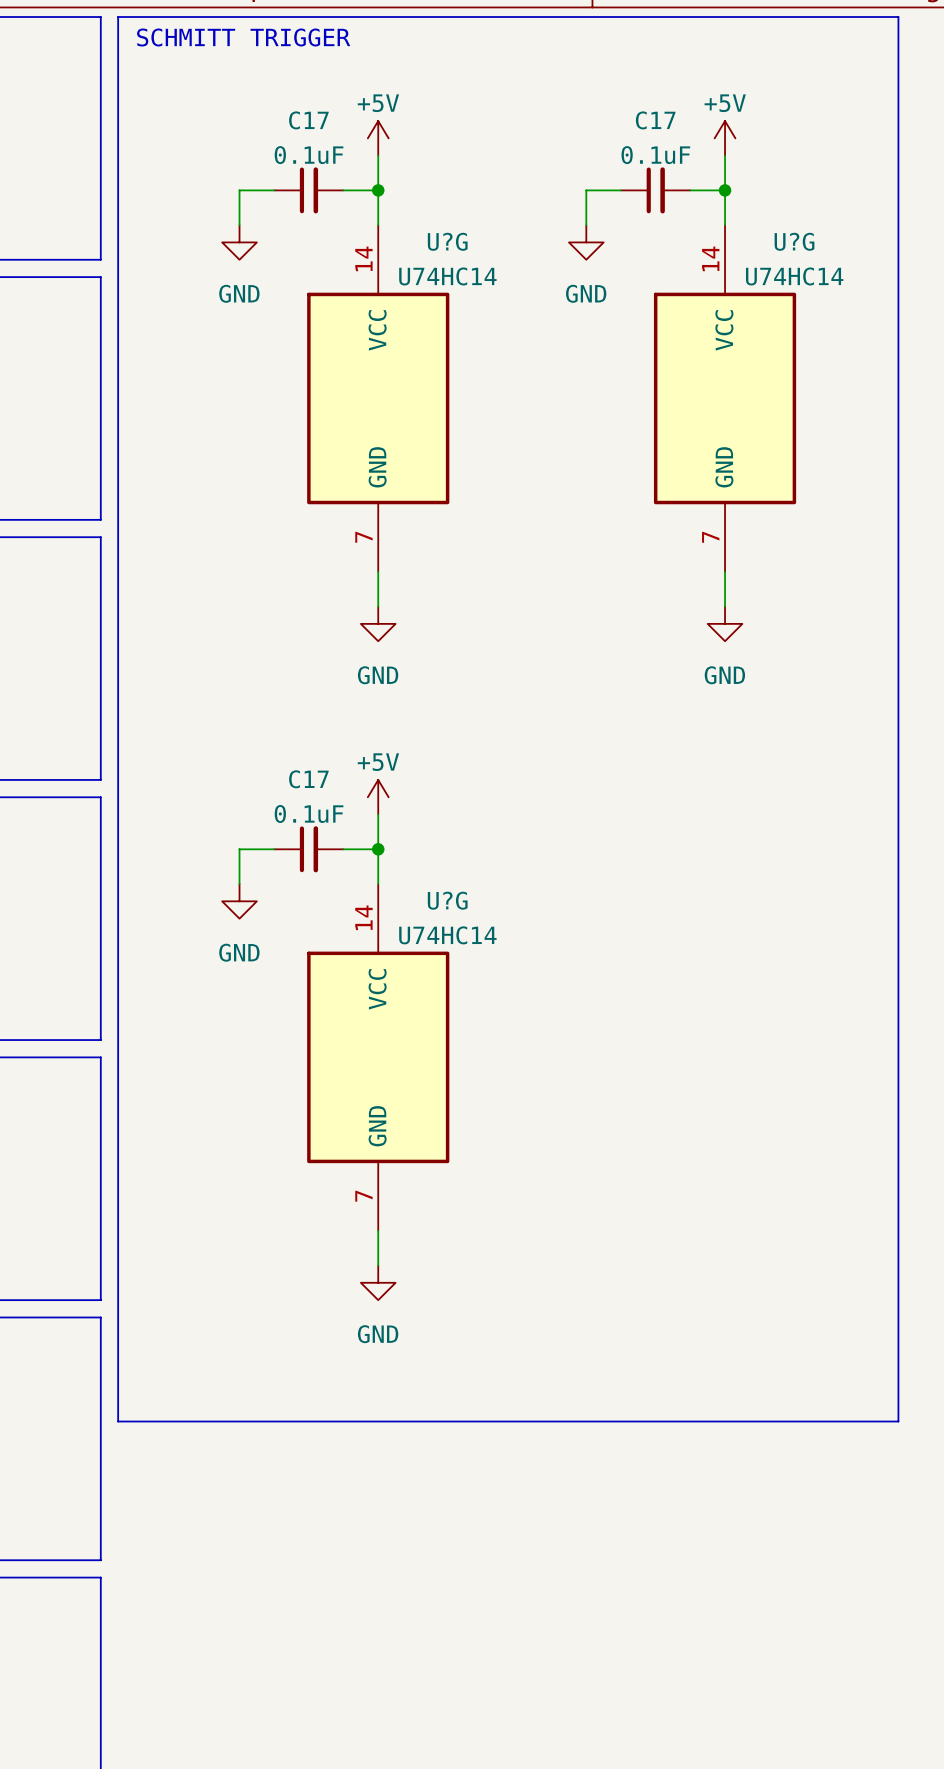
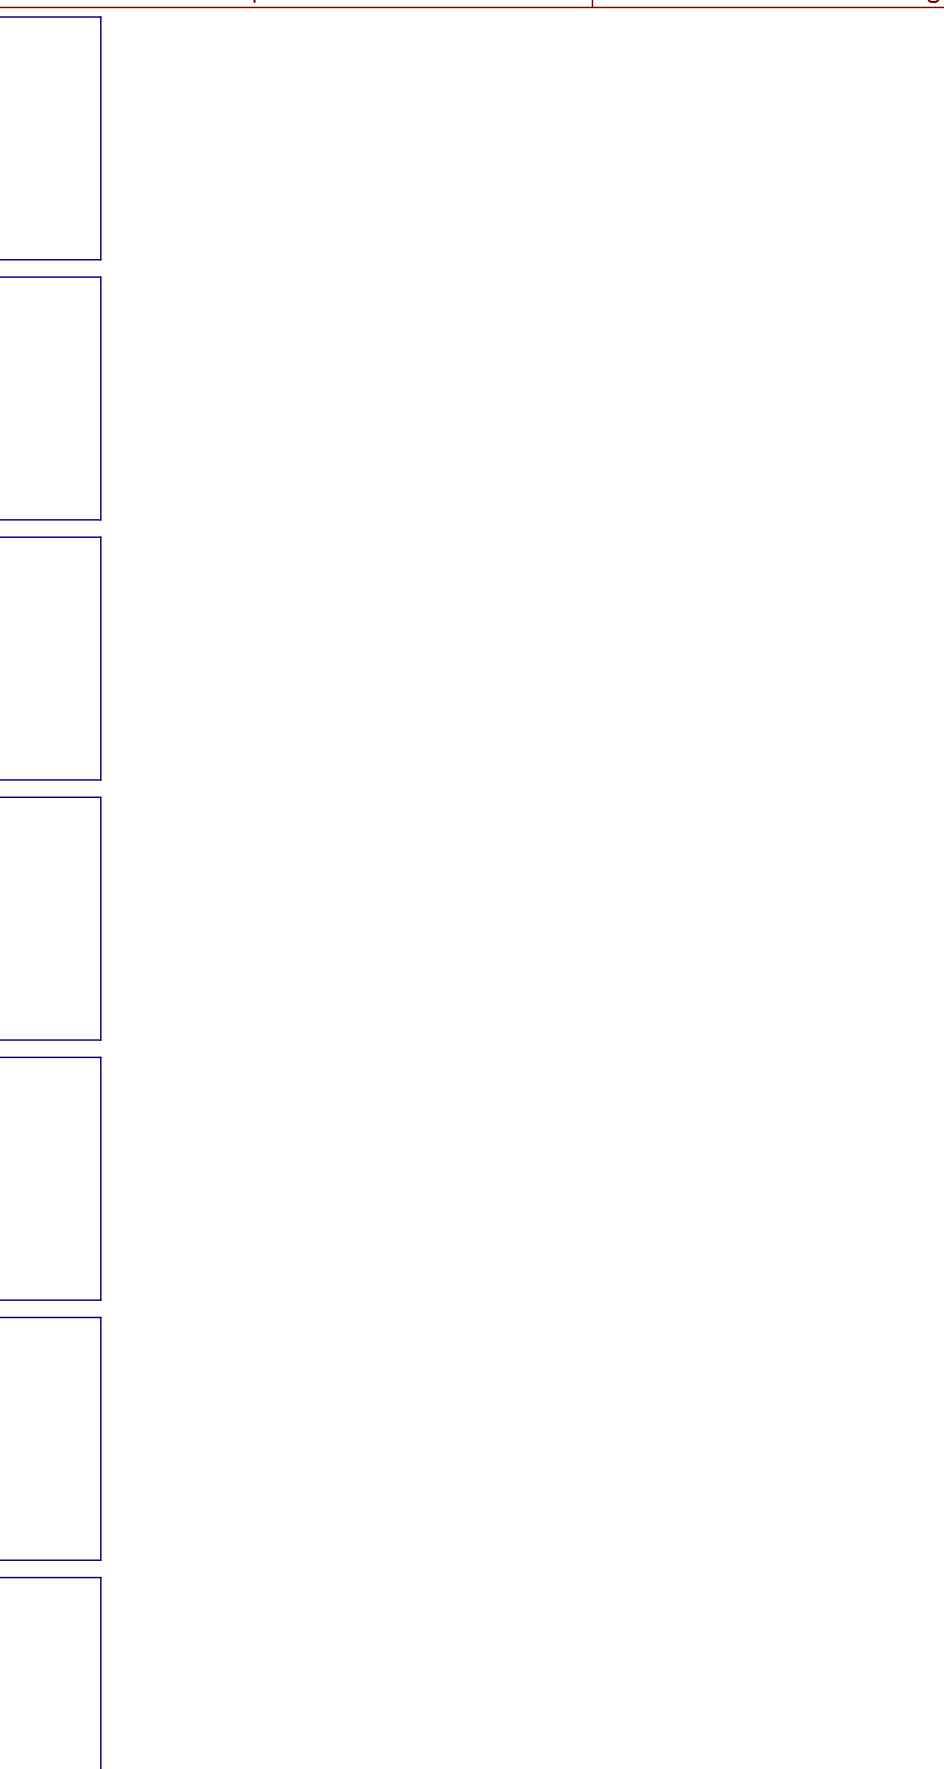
line: (118, 17) (898, 17) (898, 1421) (118, 1421) (118, 17) -> none
text: SCHMITT TRIGGER (243, 37) -> none
power symbol: +5V (378, 138) -> none
power symbol: +5V (725, 138) -> none
wire: (378, 155) (378, 225) -> none
wire: (725, 155) (725, 225) -> none
wire: (274, 190) (239, 190) (239, 225) -> none
C17: 0.1uF (308, 190) -> none
wire: (343, 190) (378, 190) -> none
junction: (378, 190) -> none
wire: (620, 190) (586, 190) (586, 225) -> none
C17: 0.1uF (655, 190) -> none
wire: (690, 190) (725, 190) -> none
junction: (725, 190) -> none
power symbol: GND (239, 242) -> none
power symbol: GND (586, 242) -> none
U?G: U74HC14 (378, 398) -> none
U?G: U74HC14 (725, 398) -> none
wire: (378, 571) (378, 606) -> none
wire: (725, 571) (725, 606) -> none
power symbol: GND (378, 623) -> none
power symbol: GND (725, 623) -> none
power symbol: +5V (378, 797) -> none
wire: (378, 814) (378, 883) -> none
wire: (274, 849) (239, 849) (239, 883) -> none
C17: 0.1uF (308, 849) -> none
wire: (343, 849) (378, 849) -> none
junction: (378, 849) -> none
power symbol: GND (239, 901) -> none
U?G: U74HC14 (378, 1057) -> none
wire: (378, 1230) (378, 1265) -> none
power symbol: GND (378, 1282) -> none

